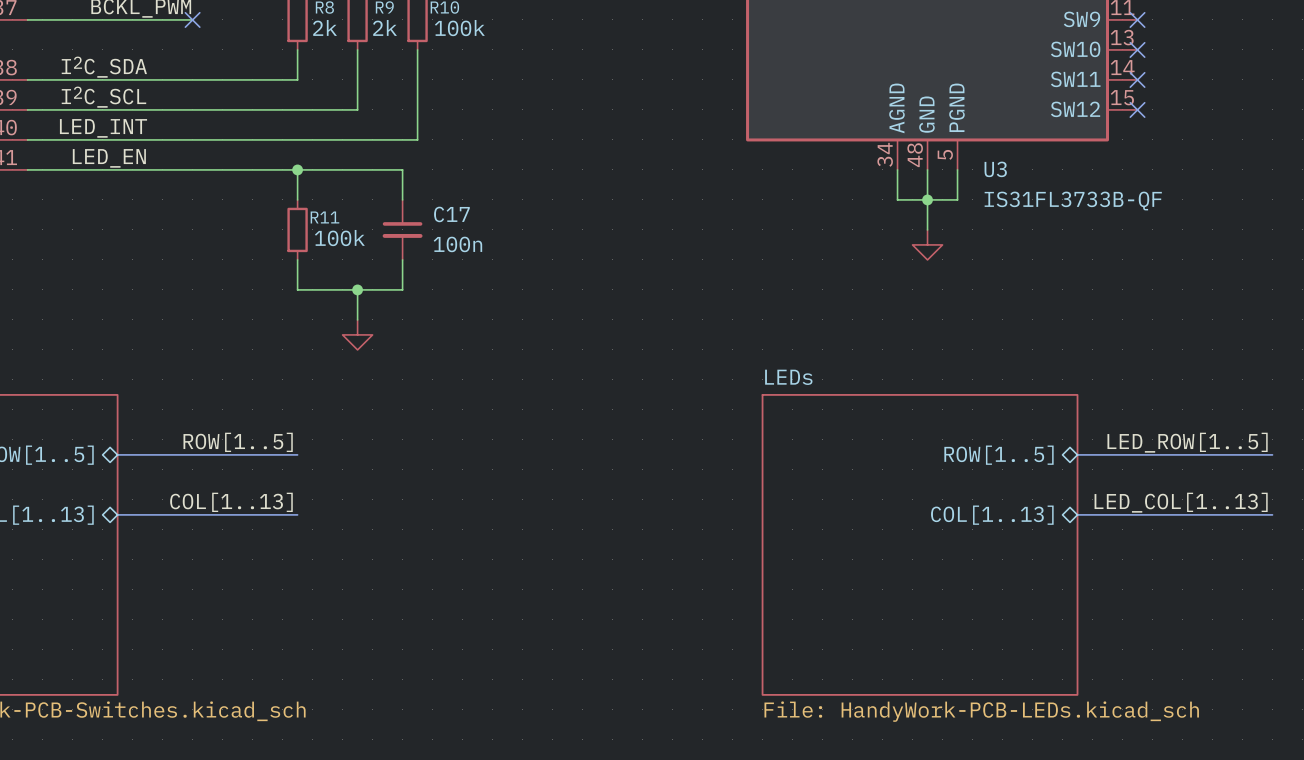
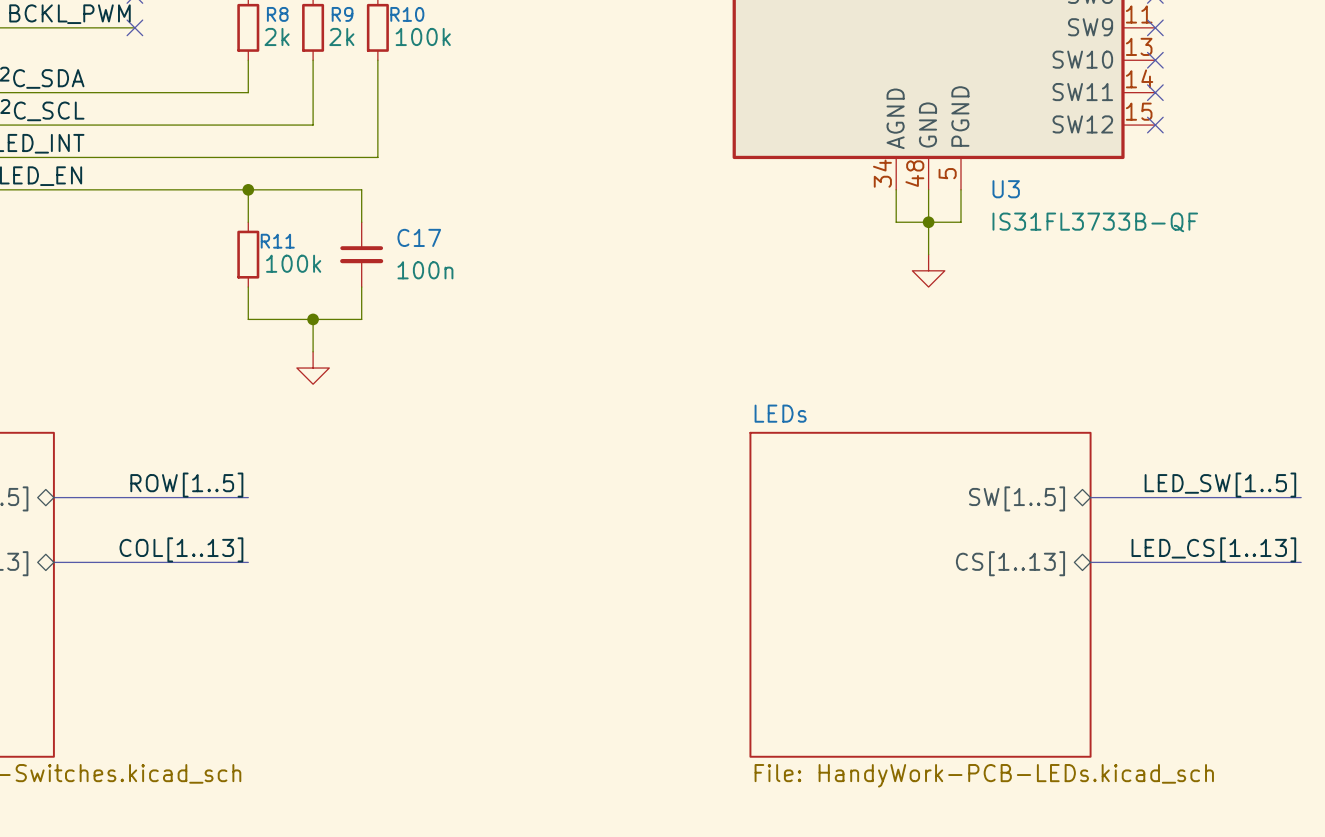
label: LED_ROW[1..5] (1187, 442) -> LED_SW[1..5] (1220, 485)
sheet pin: ROW[1..5] (998, 455) -> SW[1..5] (1017, 498)
label: LED_COL[1..13] (1181, 502) -> LED_CS[1..13] (1213, 549)
sheet pin: COL[1..13] (992, 515) -> CS[1..13] (1010, 563)

